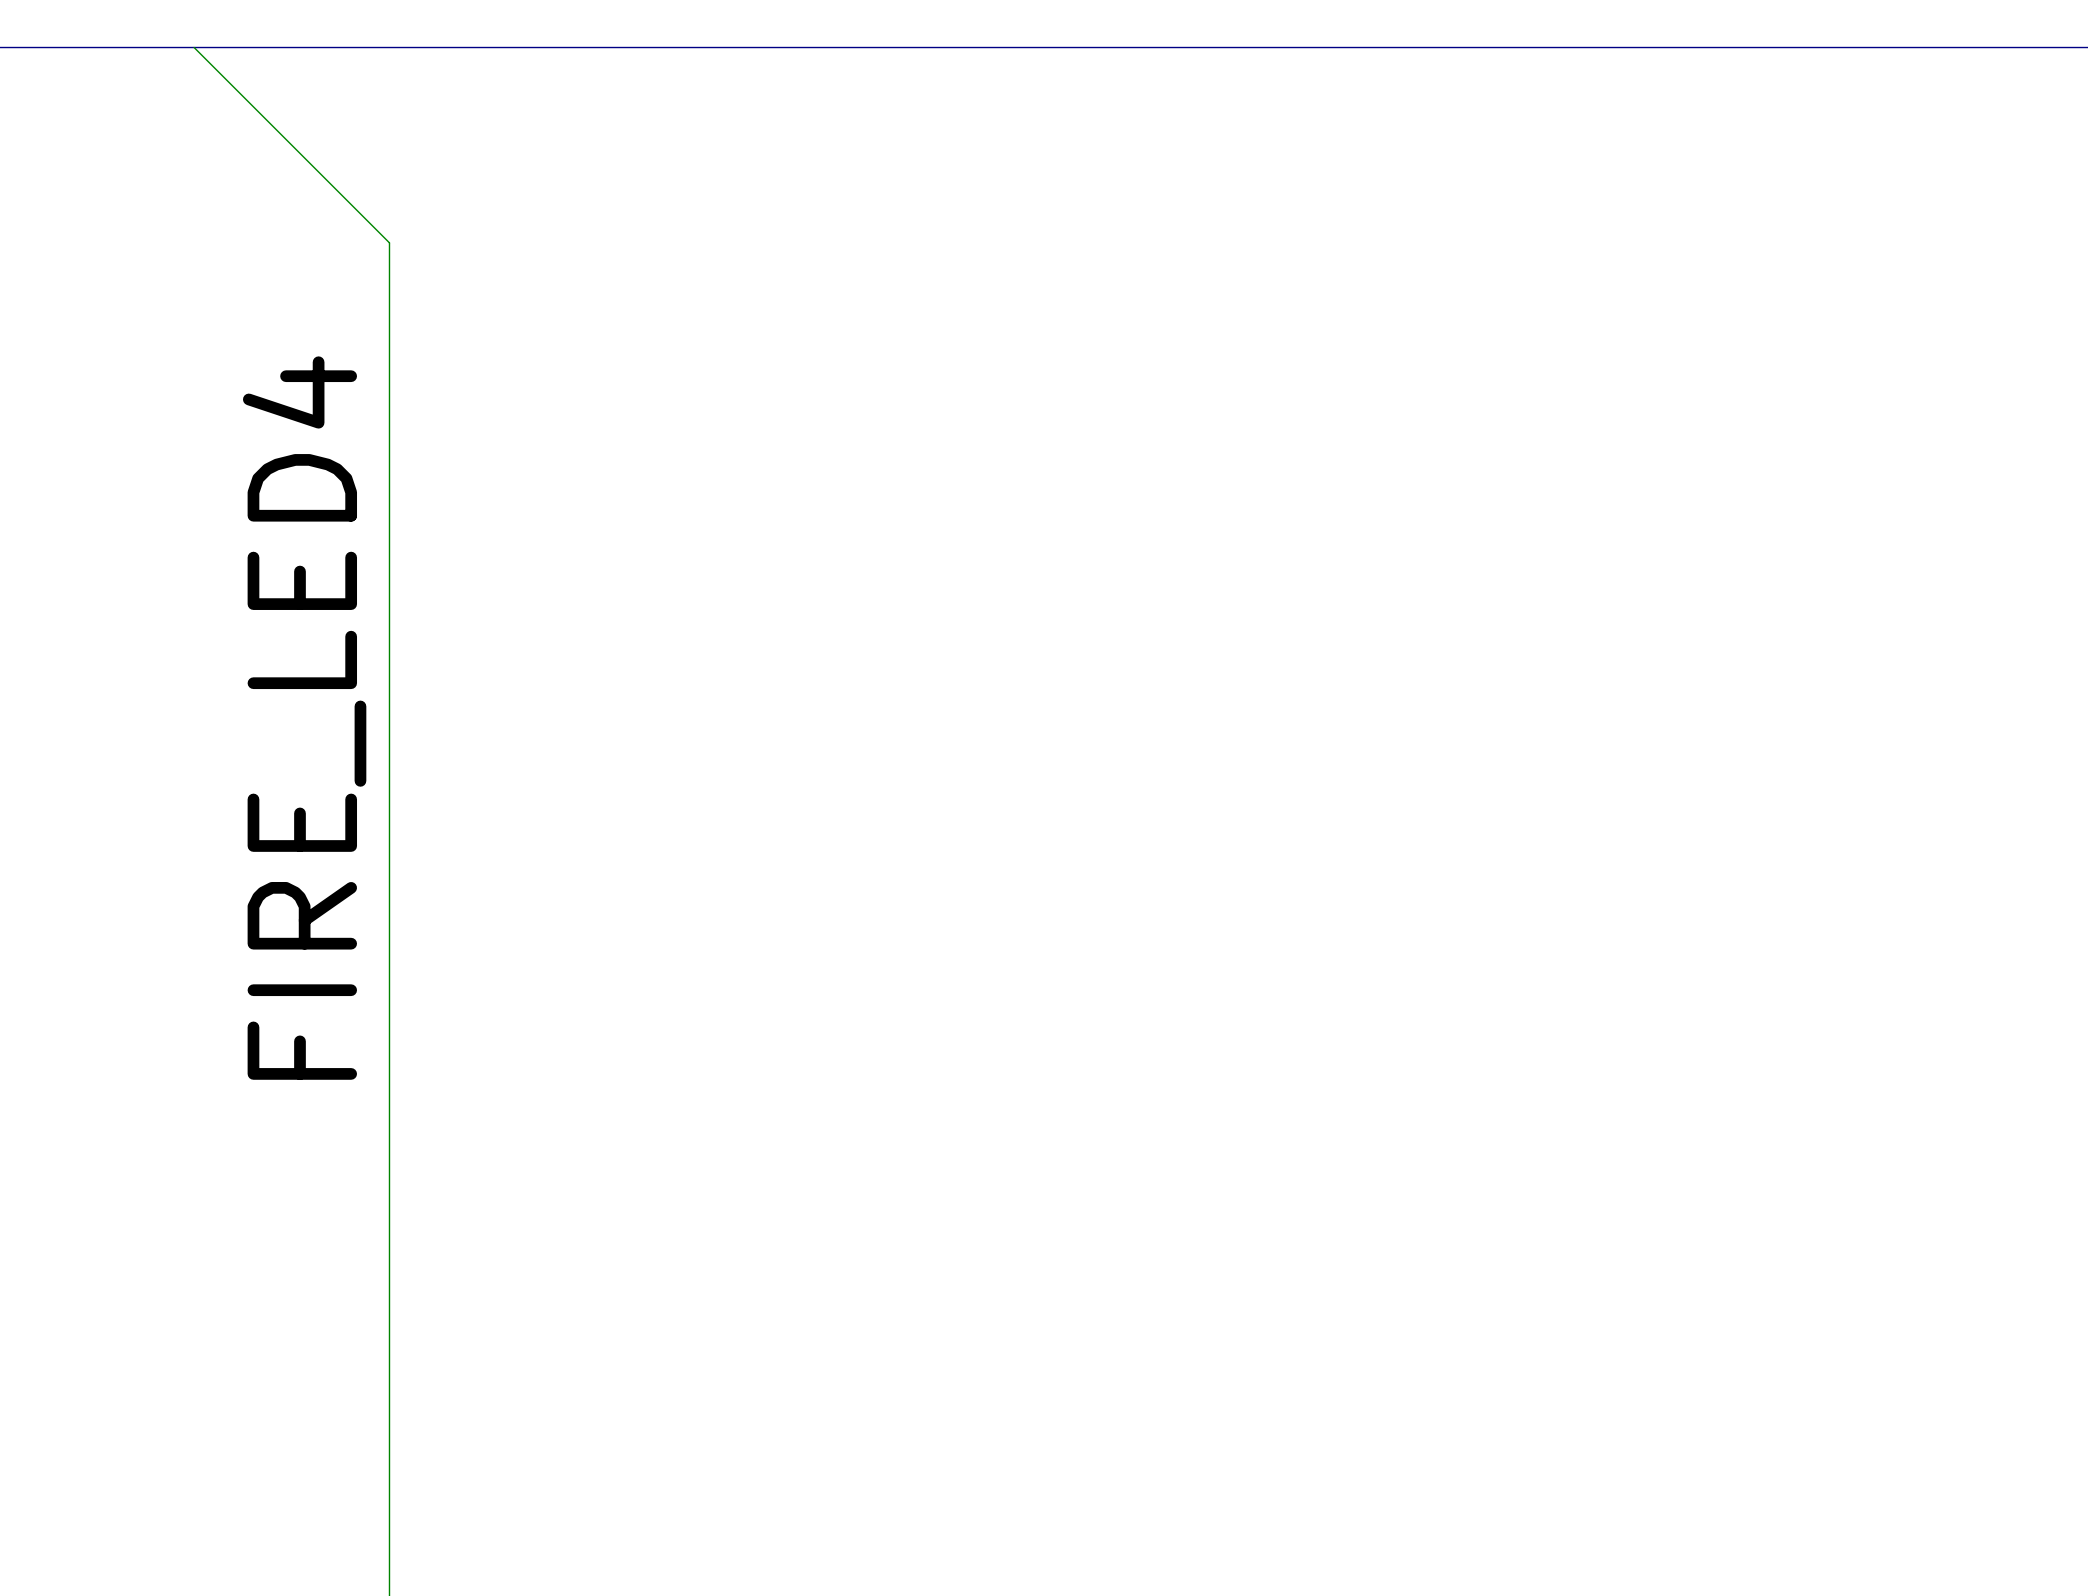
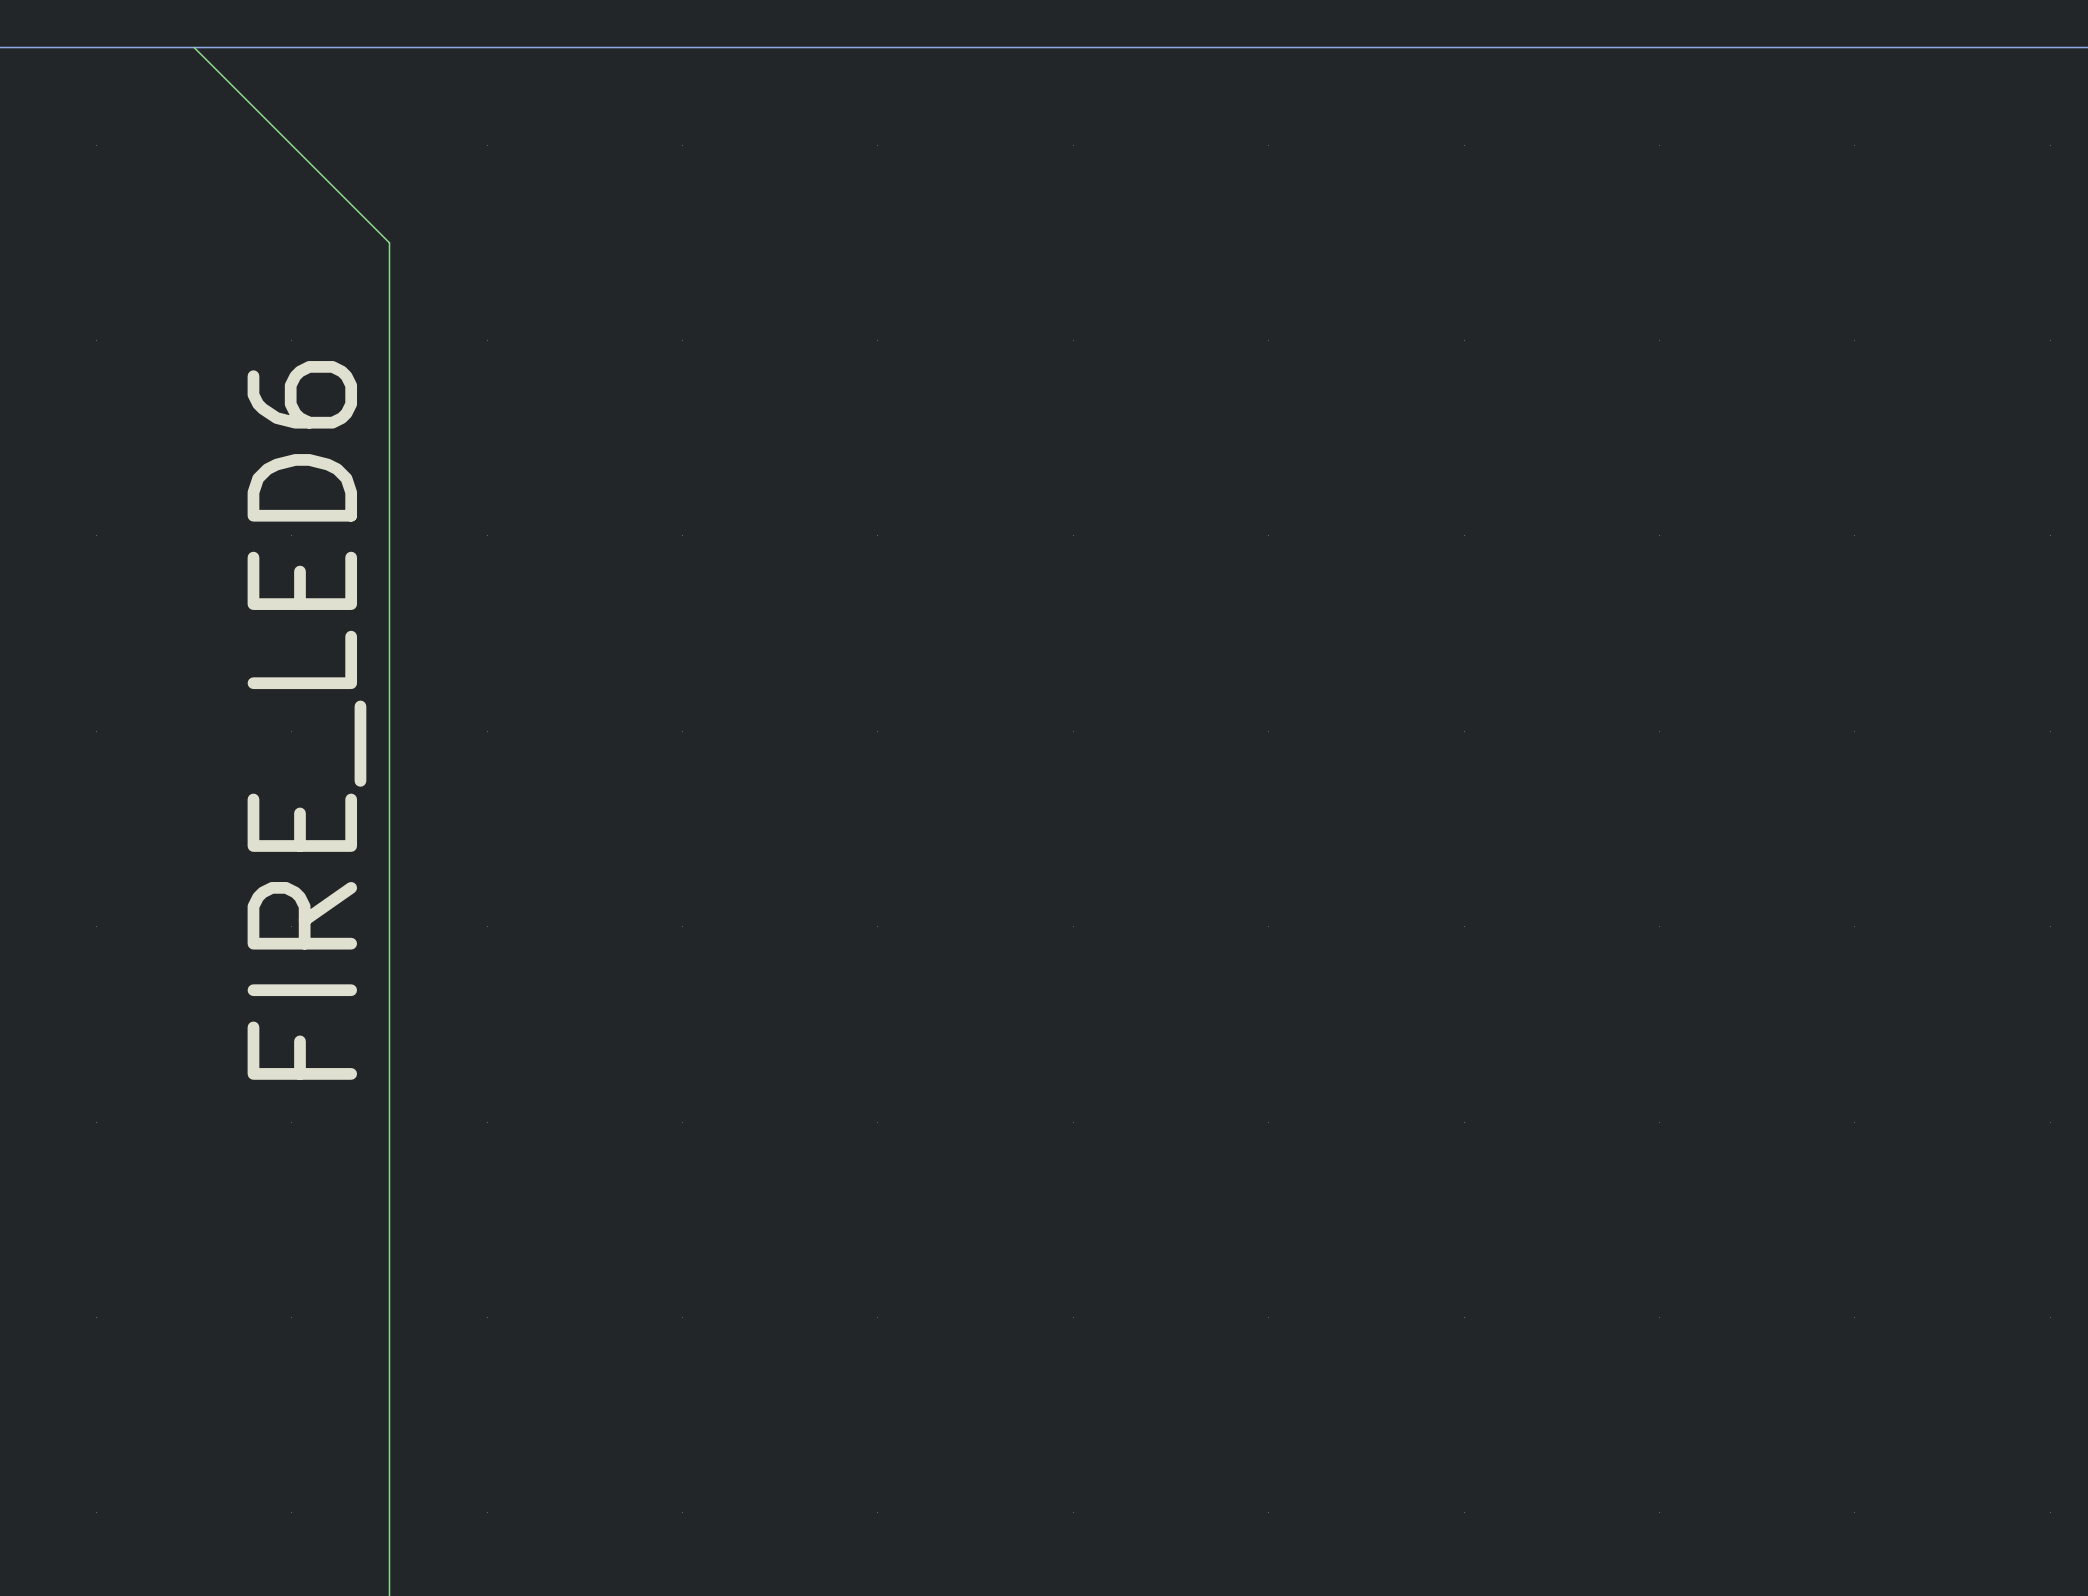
label: FIRE_LED4 (304, 718) -> FIRE_LED6 (306, 720)

